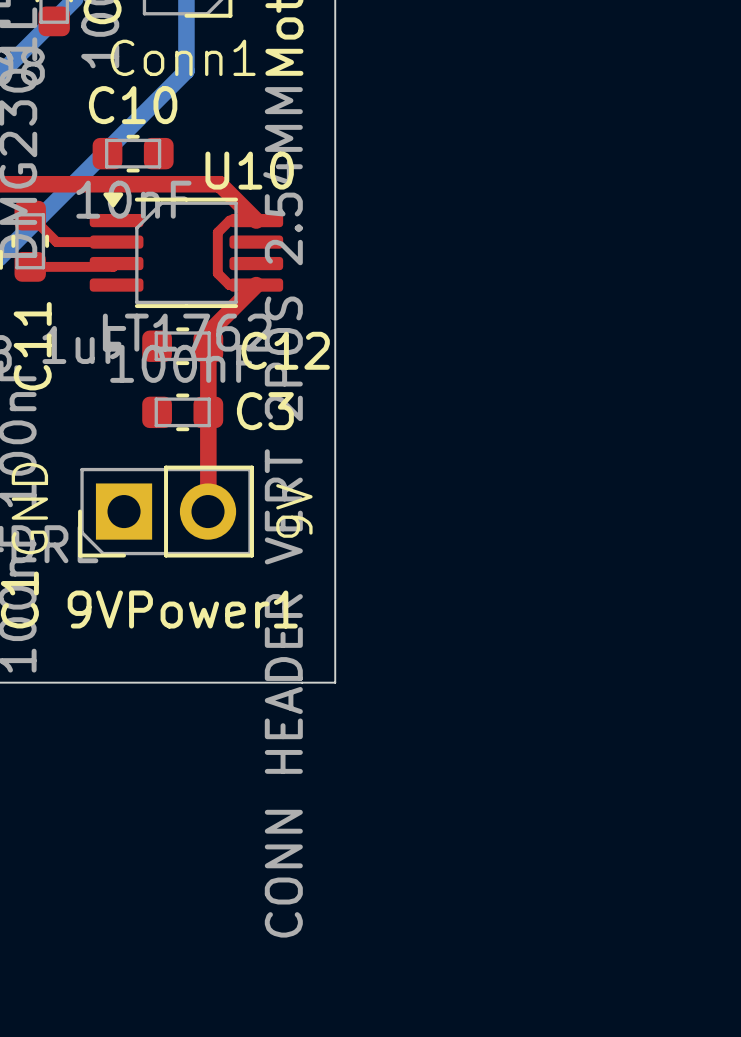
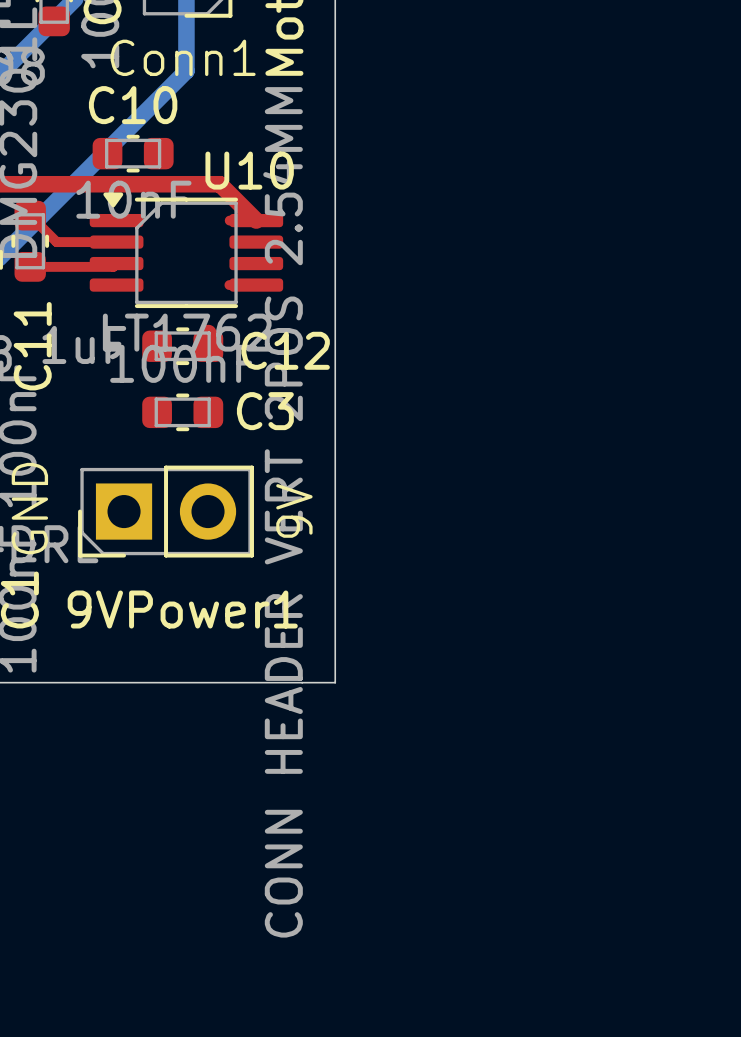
top track: (229, 220) (217, 232) (217, 273) (229, 285) -> none
top track: (256, 285) (208, 333) -> none
top track: (208, 346) (208, 511) -> none

